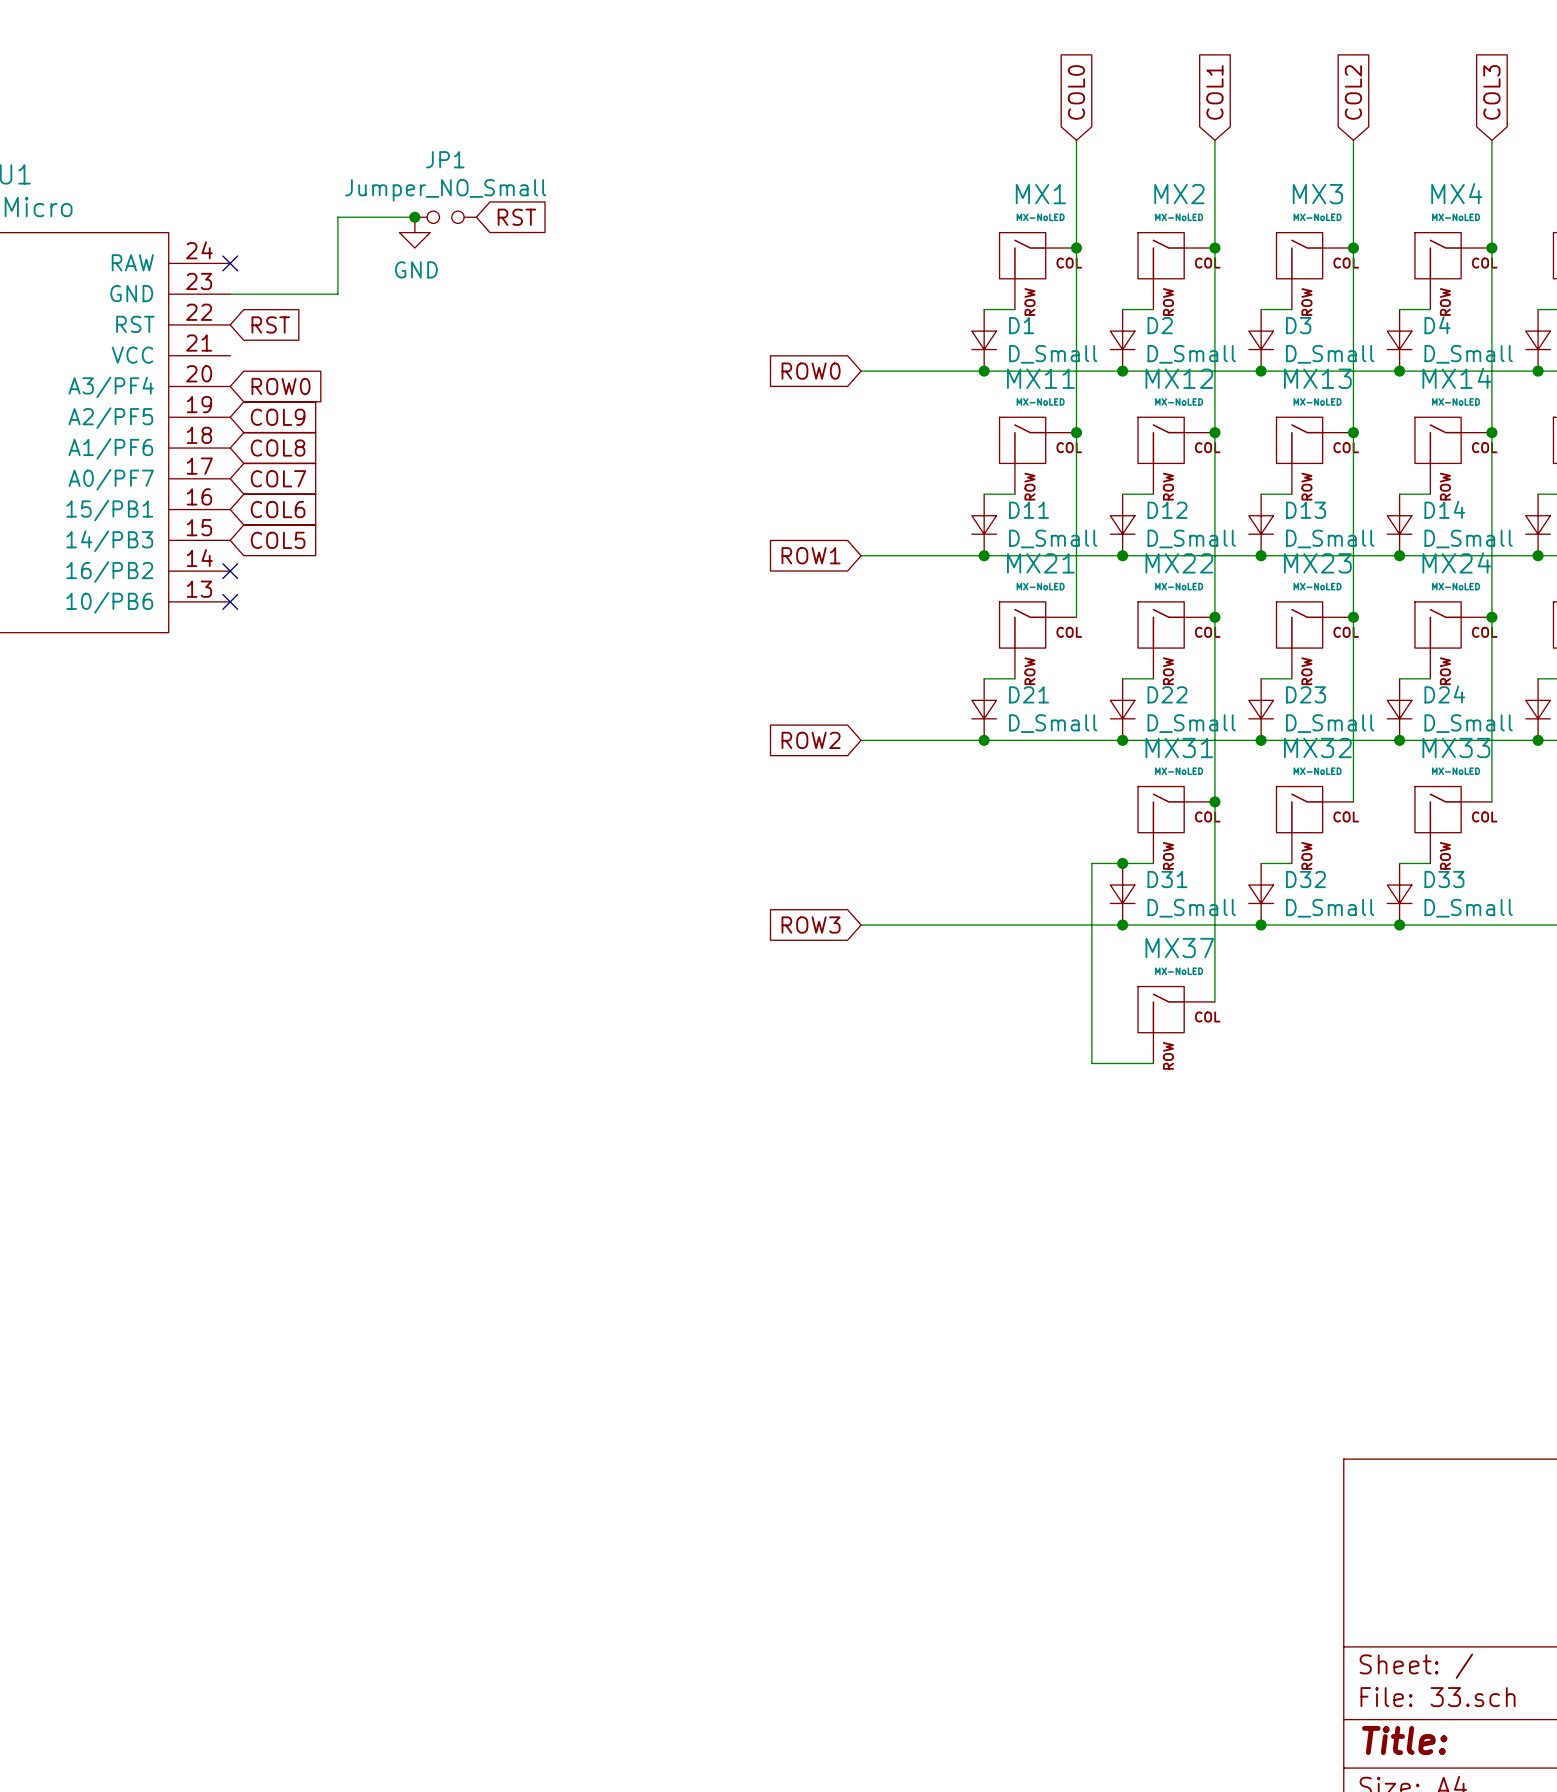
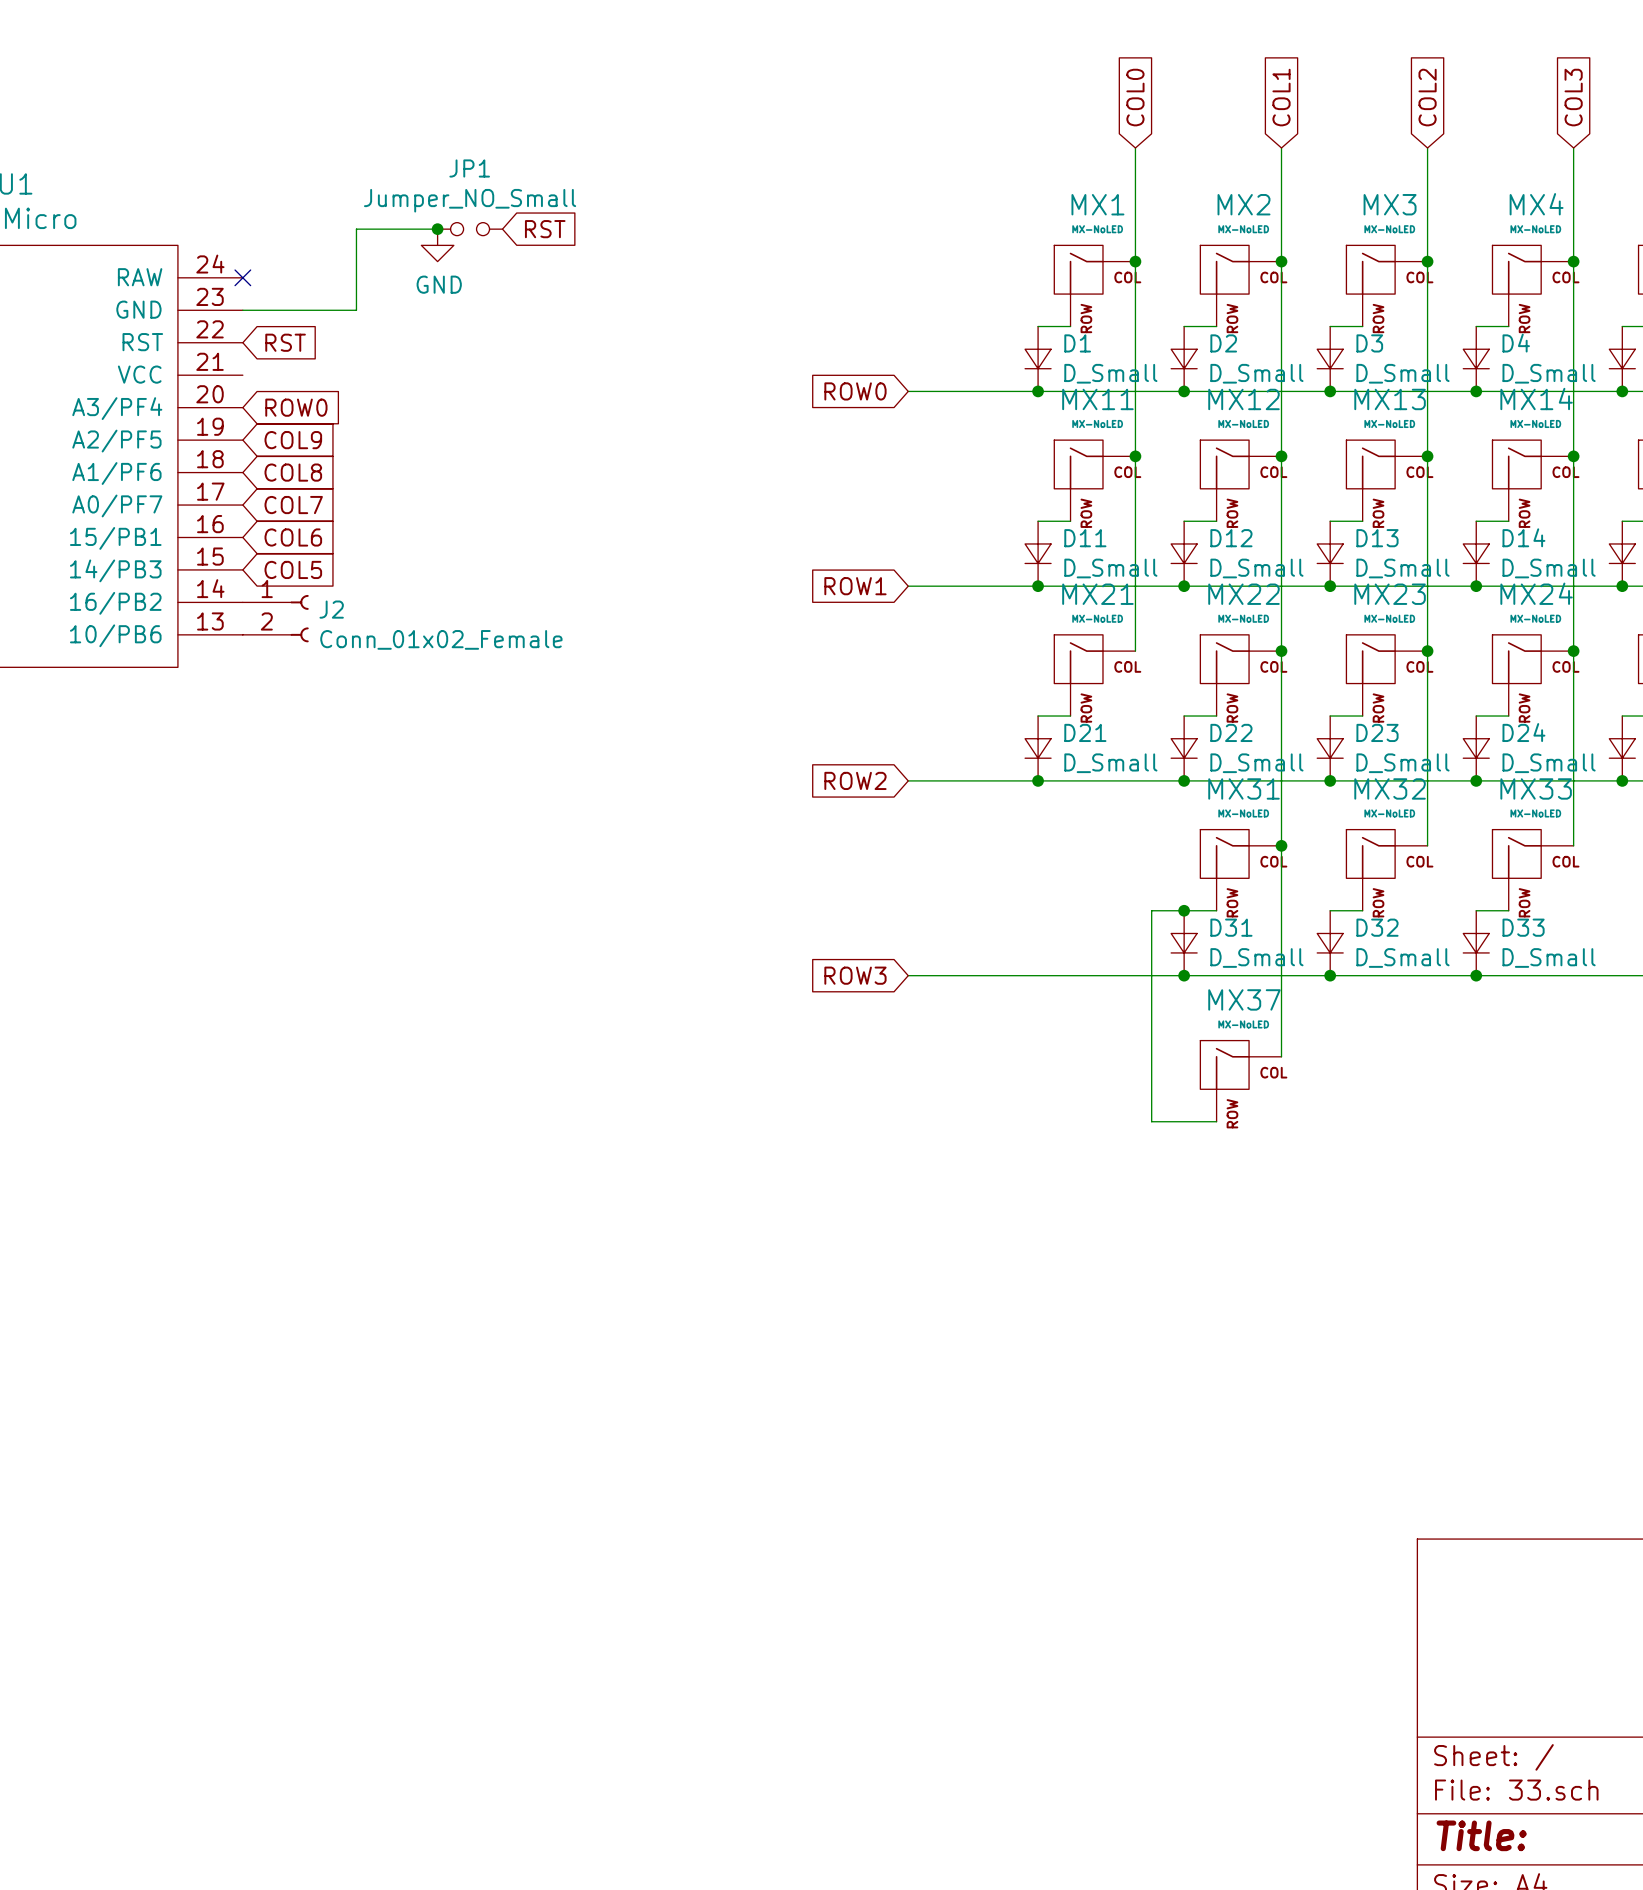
no-connect mark: (230, 571) -> none
J2: none -> Conn_01x02_Female (275, 618)
no-connect mark: (230, 601) -> none

